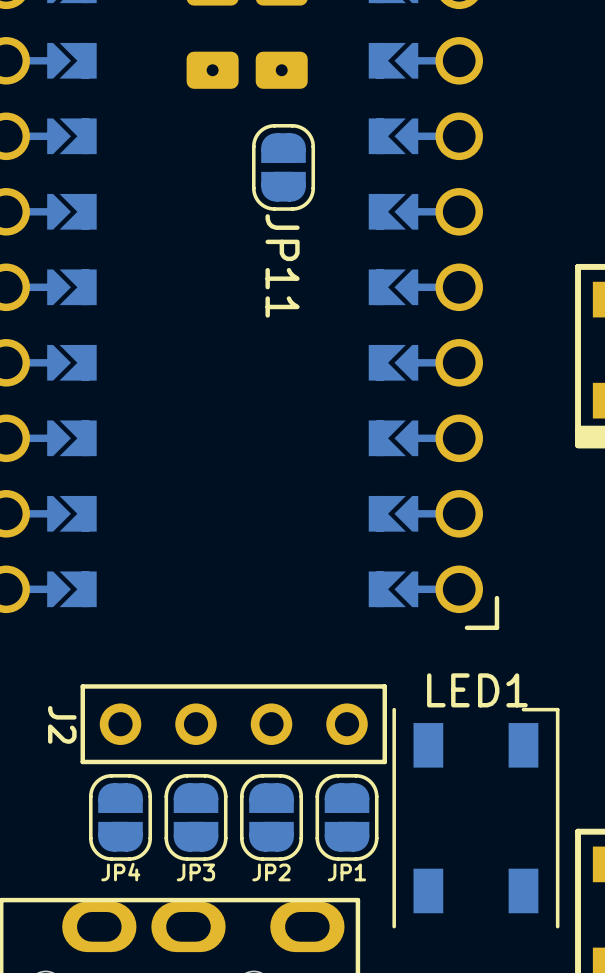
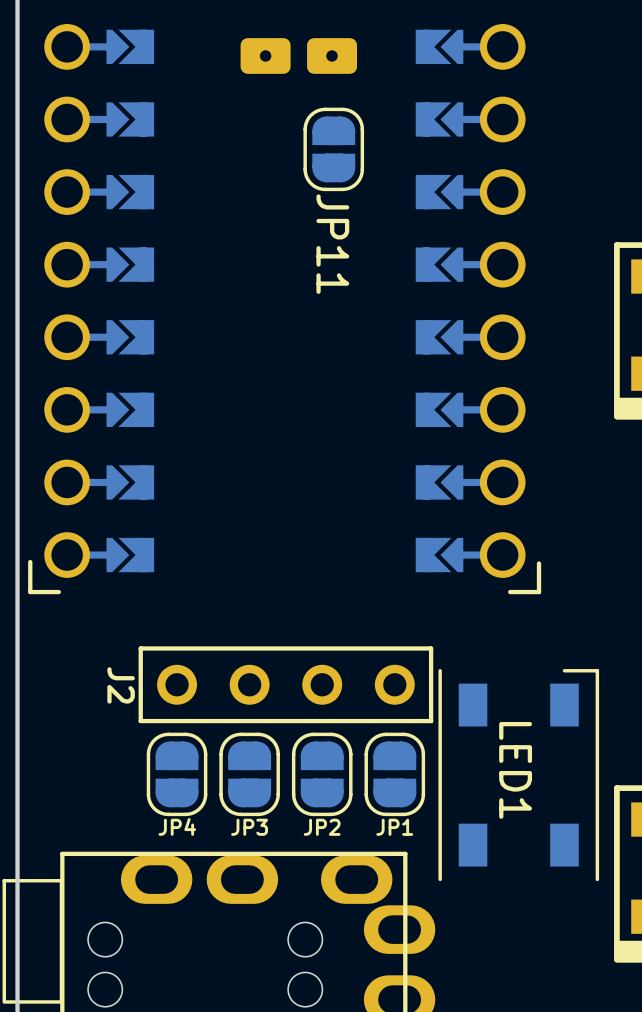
LED1 name rotation: 0° (477, 690) -> 90° clockwise (515, 770)

